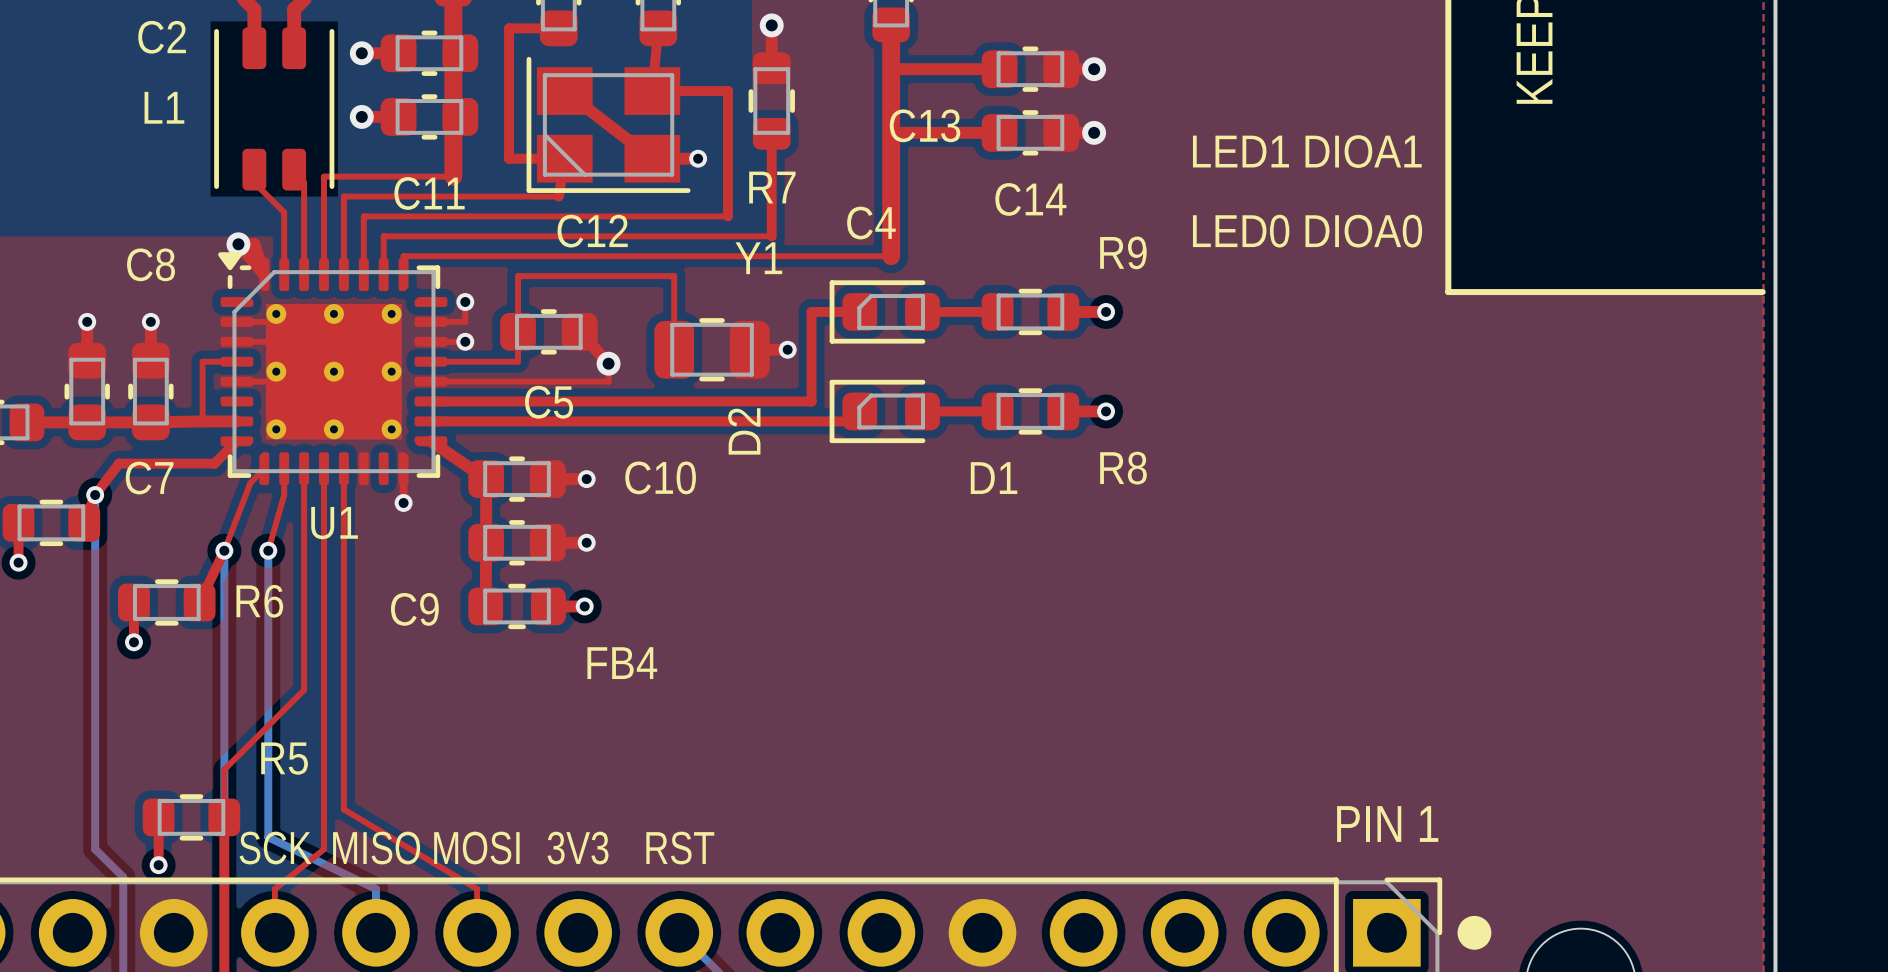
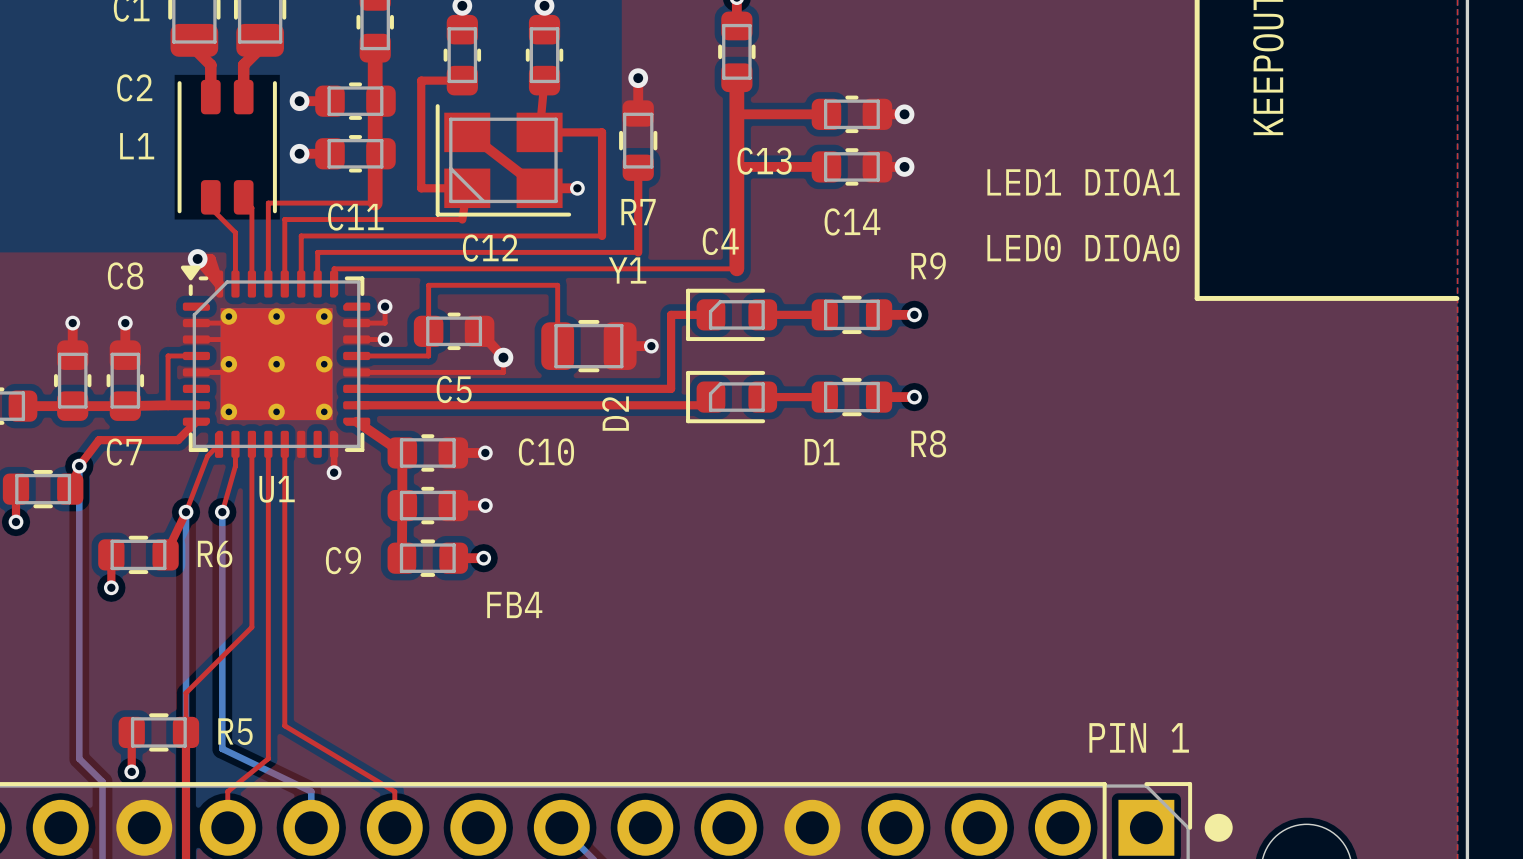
R5 name position: R5 (284, 758) -> R5 (235, 731)
text: SCK (275, 848) -> none
text: MISO (376, 848) -> none
text: MOSI (476, 848) -> none
text: 3V3 (578, 848) -> none
text: RST (680, 848) -> none

